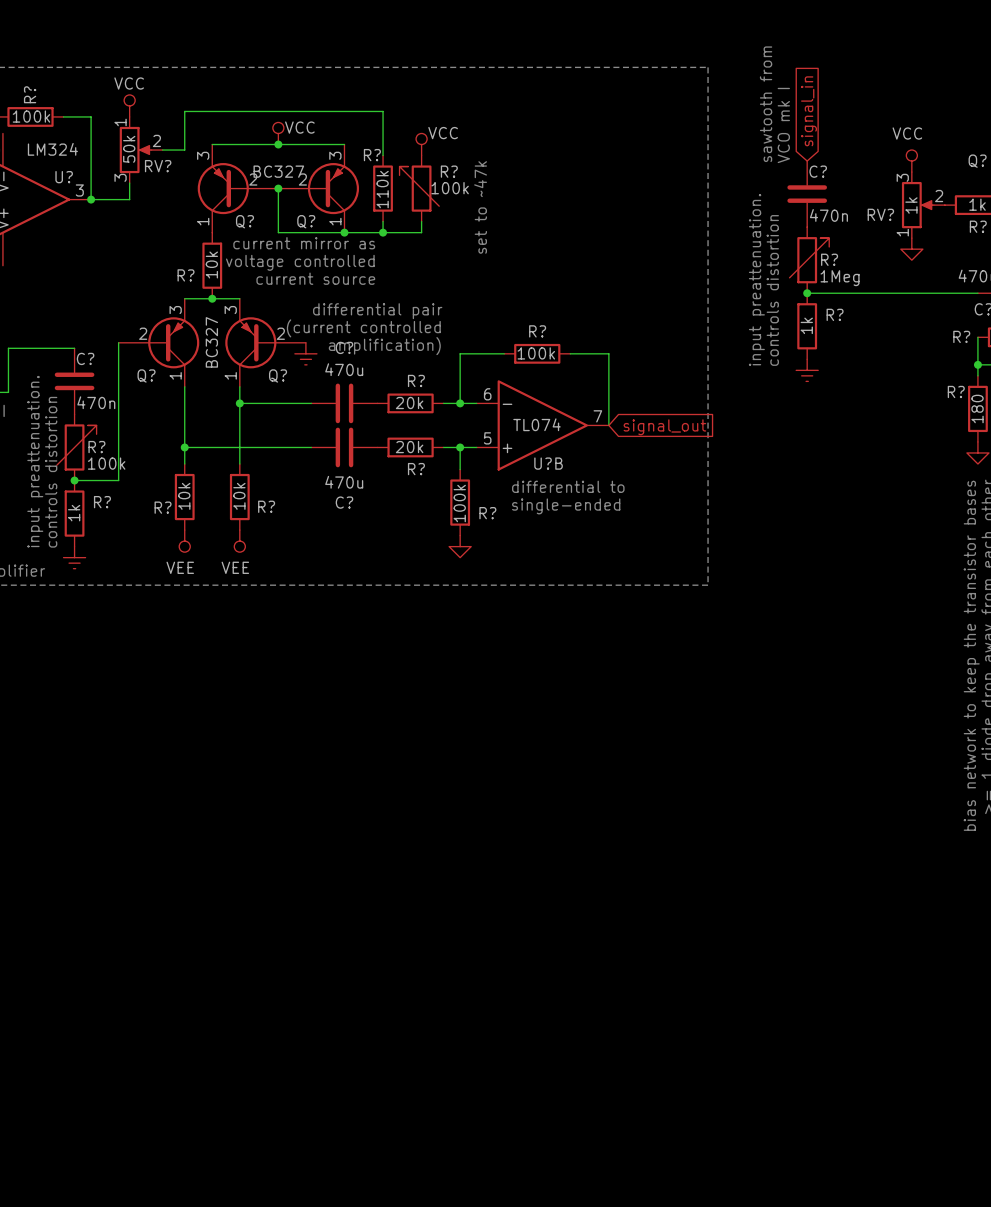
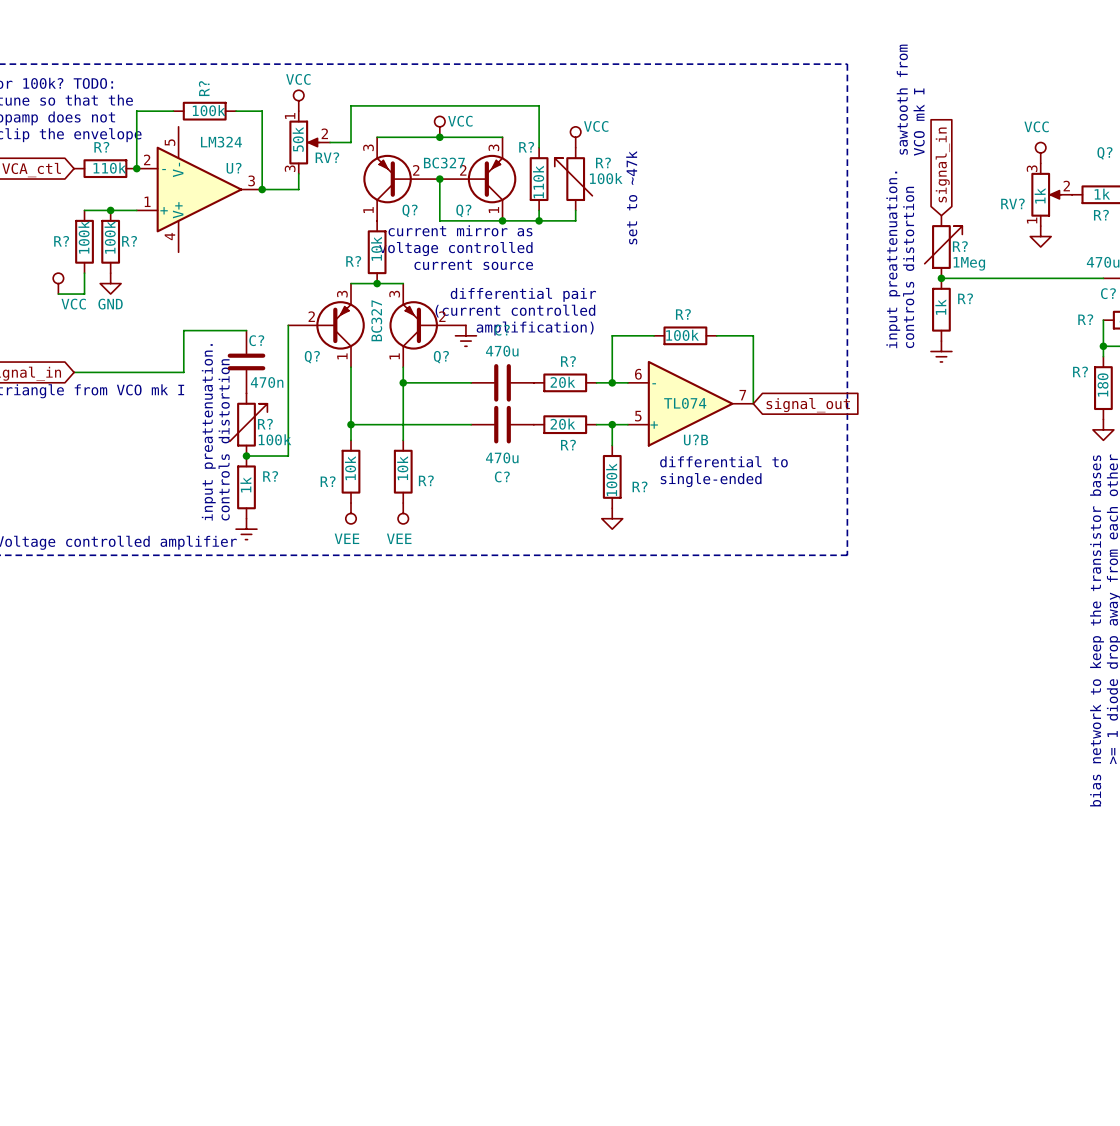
global label position: signal_in (809, 111) -> signal_in (942, 164)
C?: 470n (807, 194) -> none

